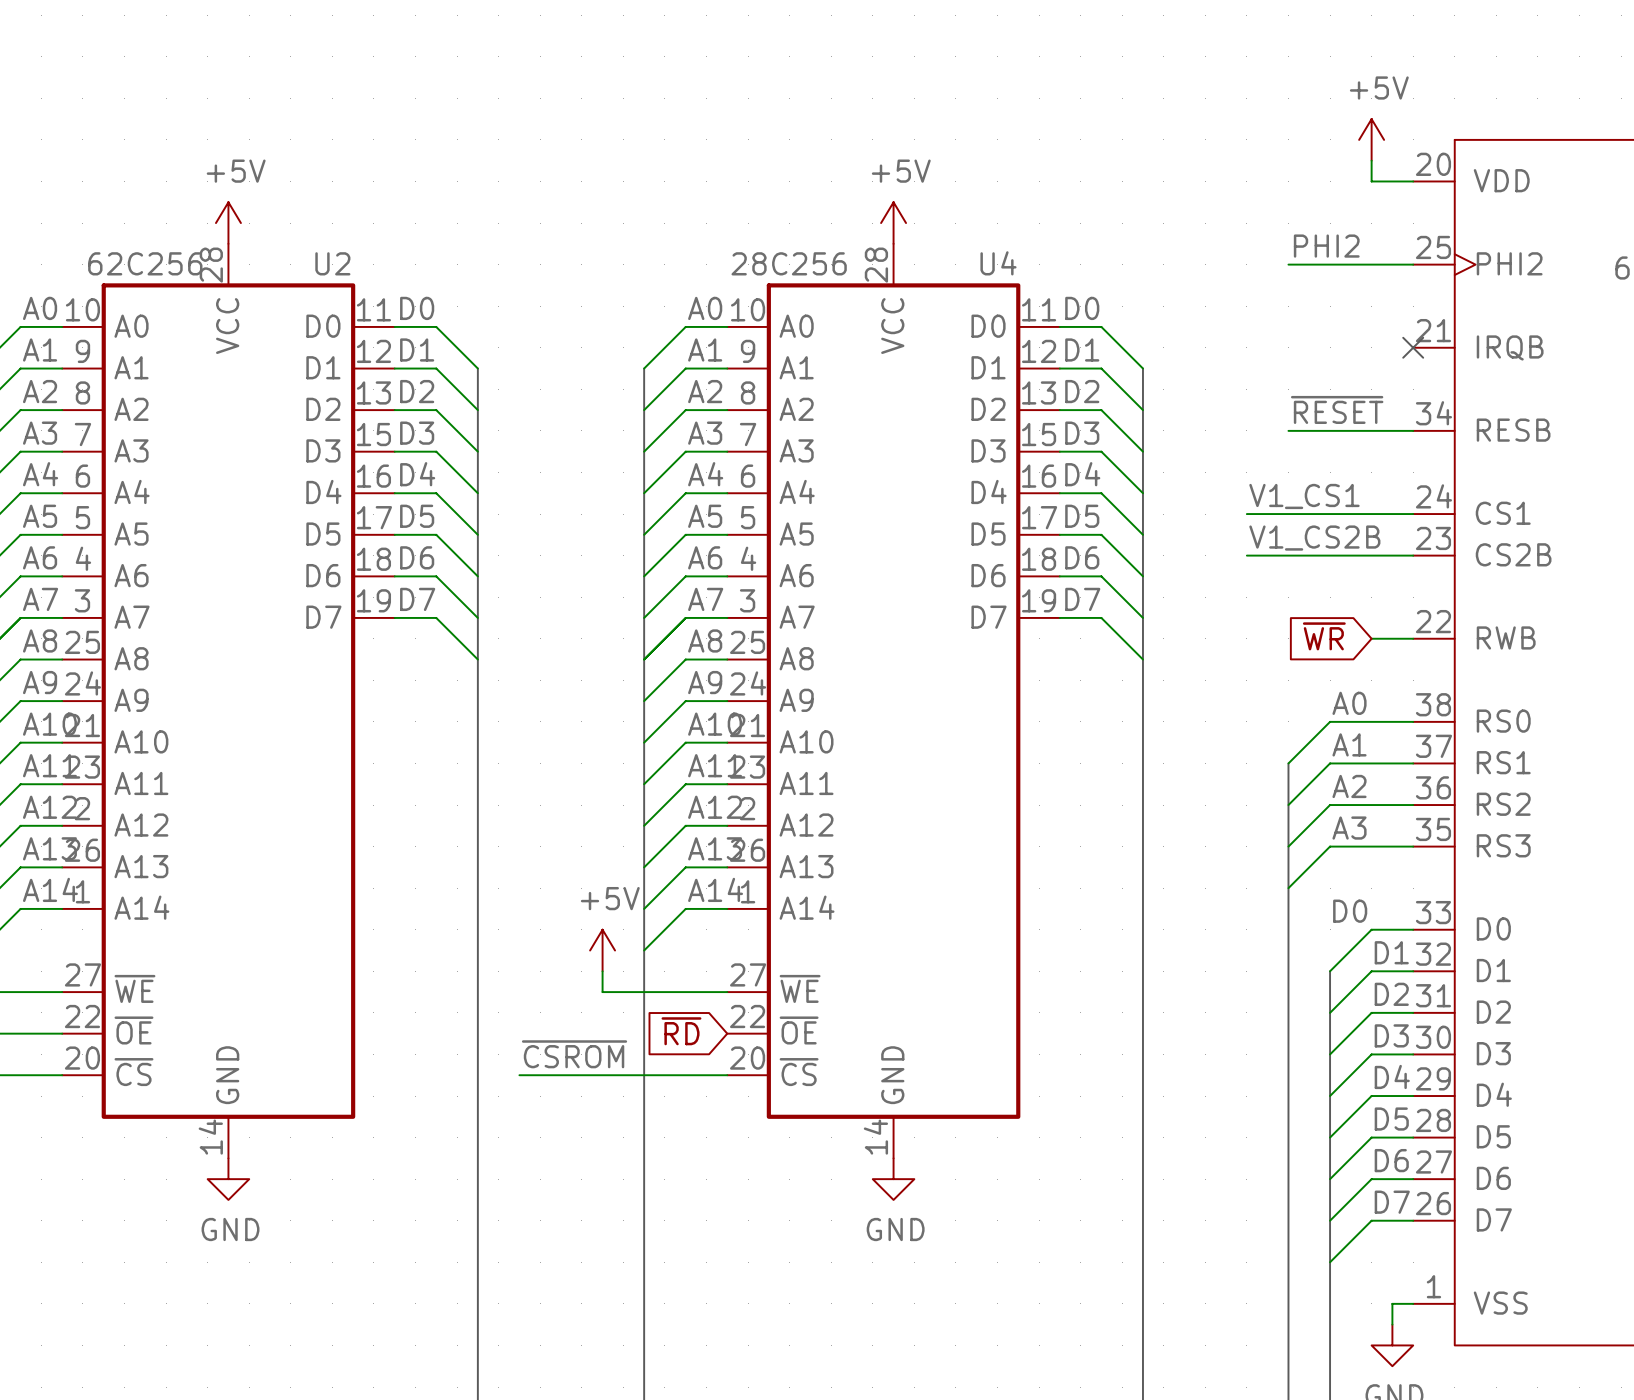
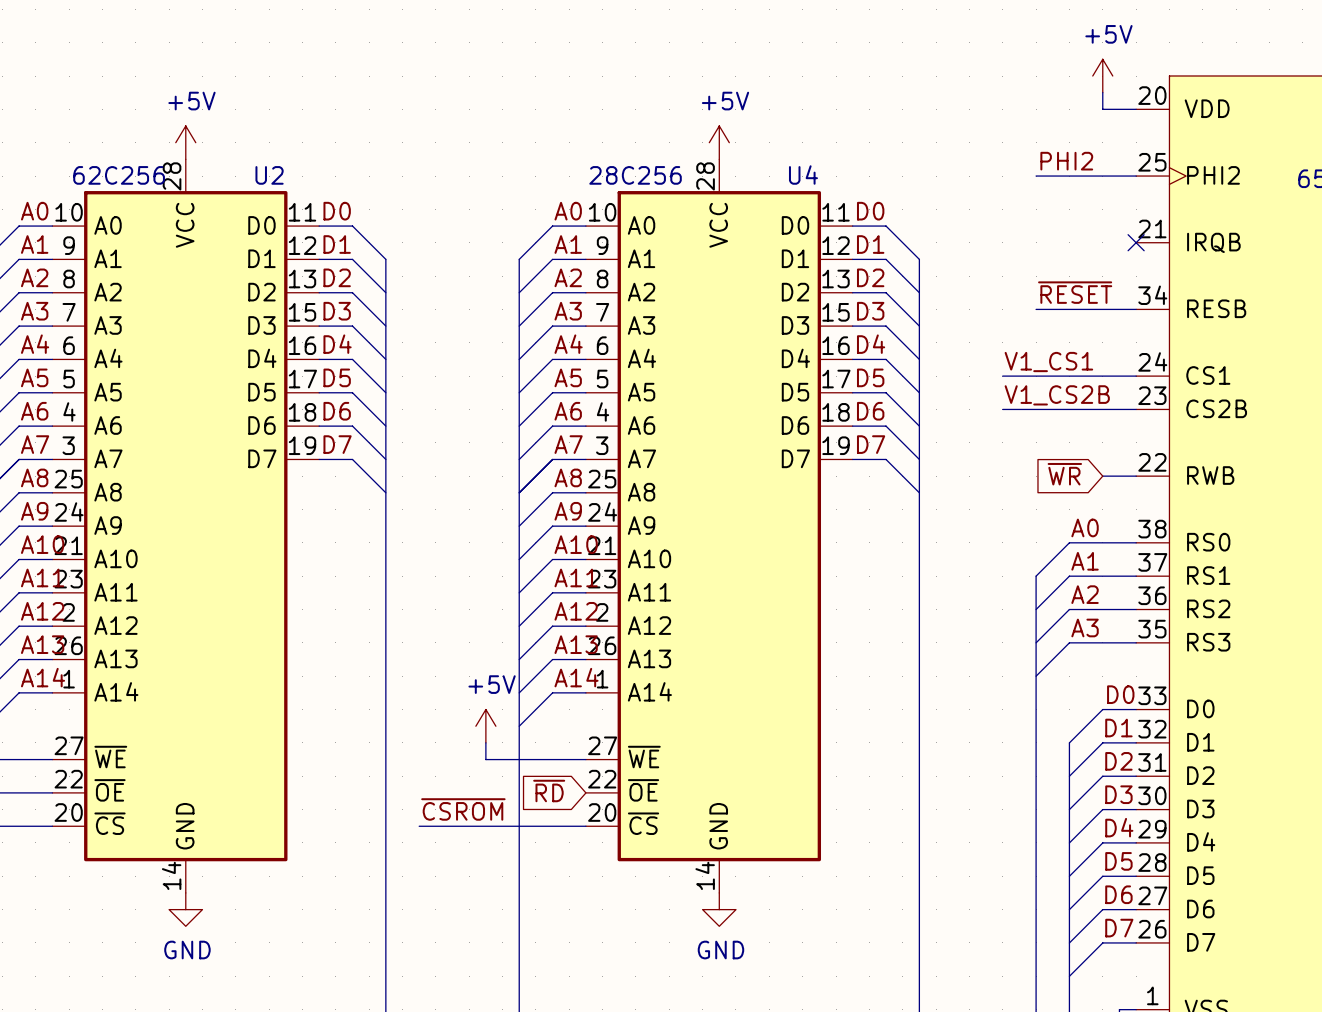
label position: D0 (1350, 911) -> D0 (1120, 694)

